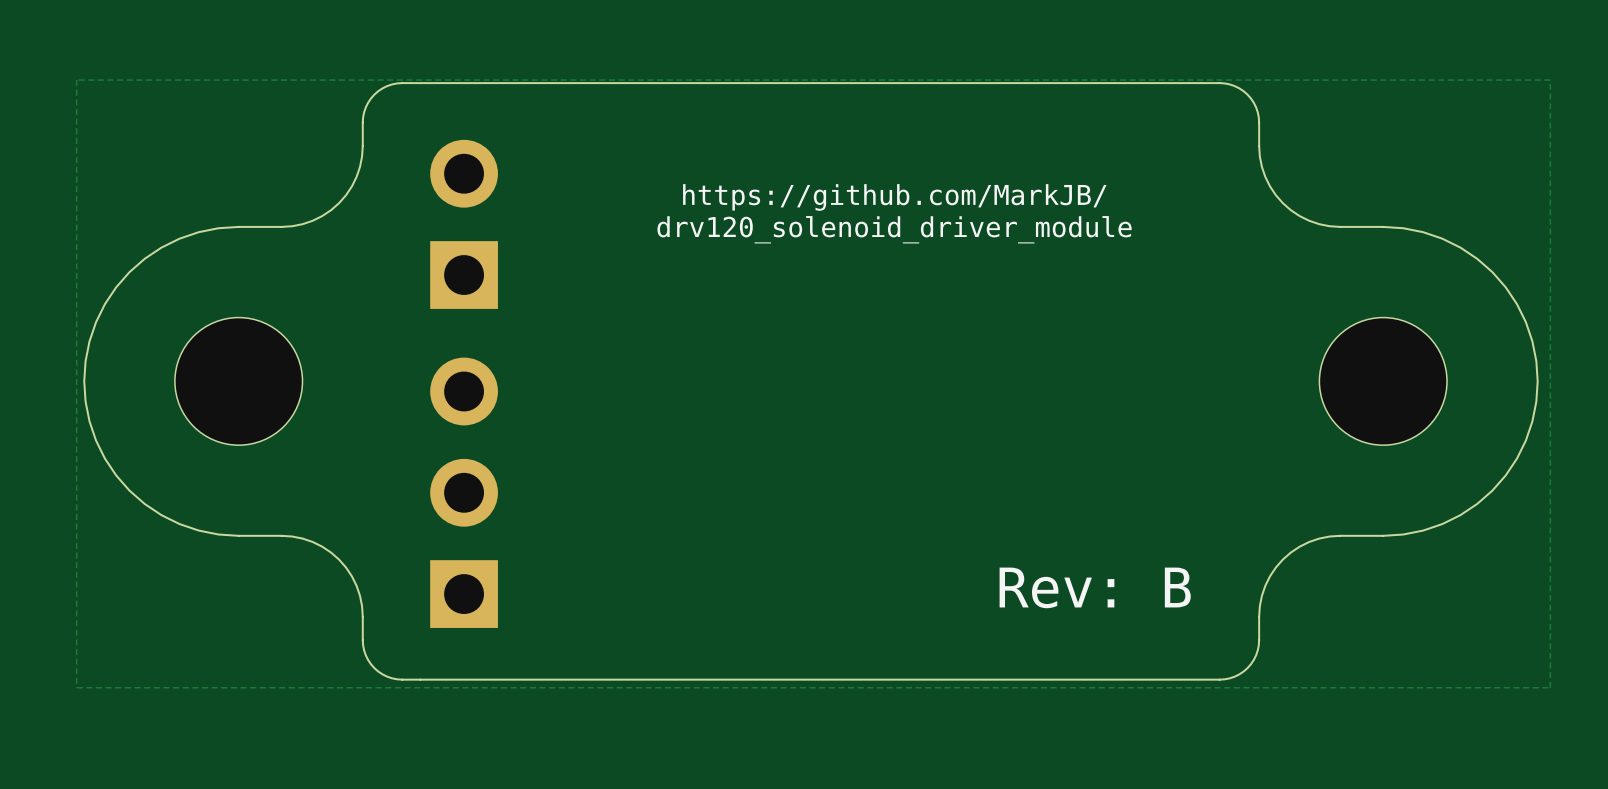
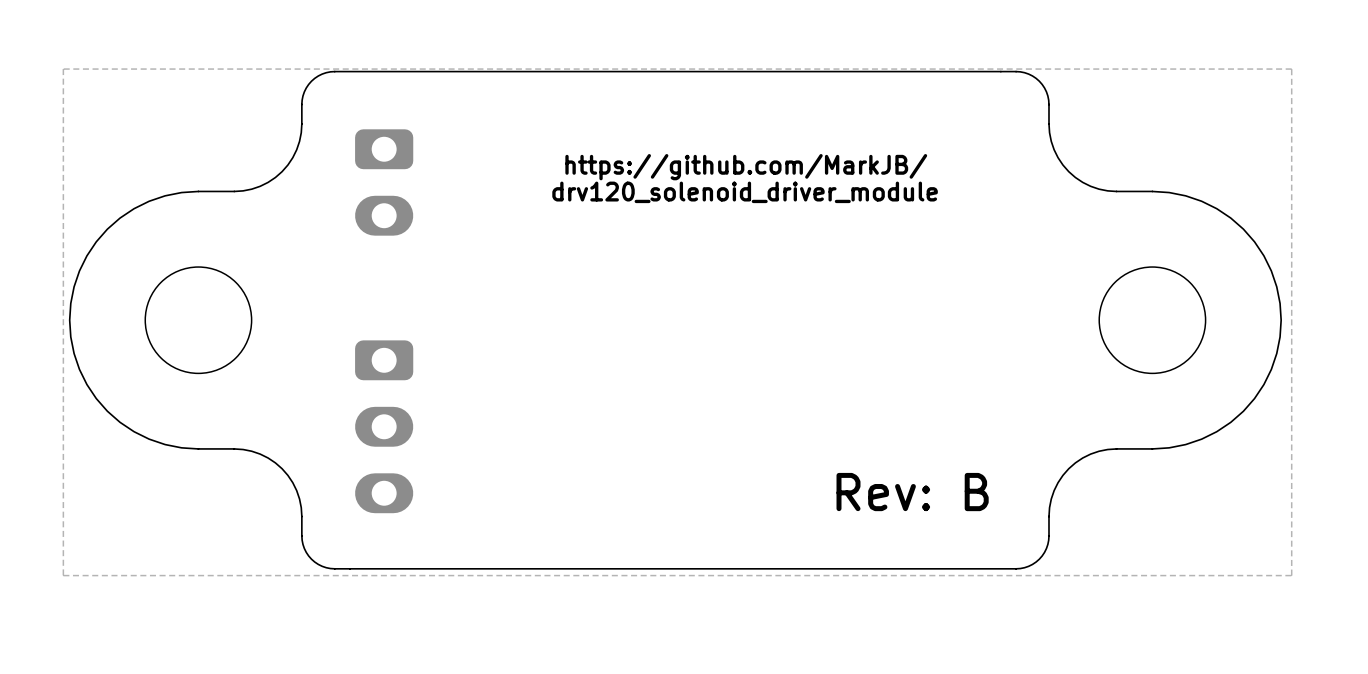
part footprint: [430, 139, 498, 309] -> [355, 129, 414, 236]
part footprint: [430, 357, 498, 628] -> [355, 340, 414, 514]

